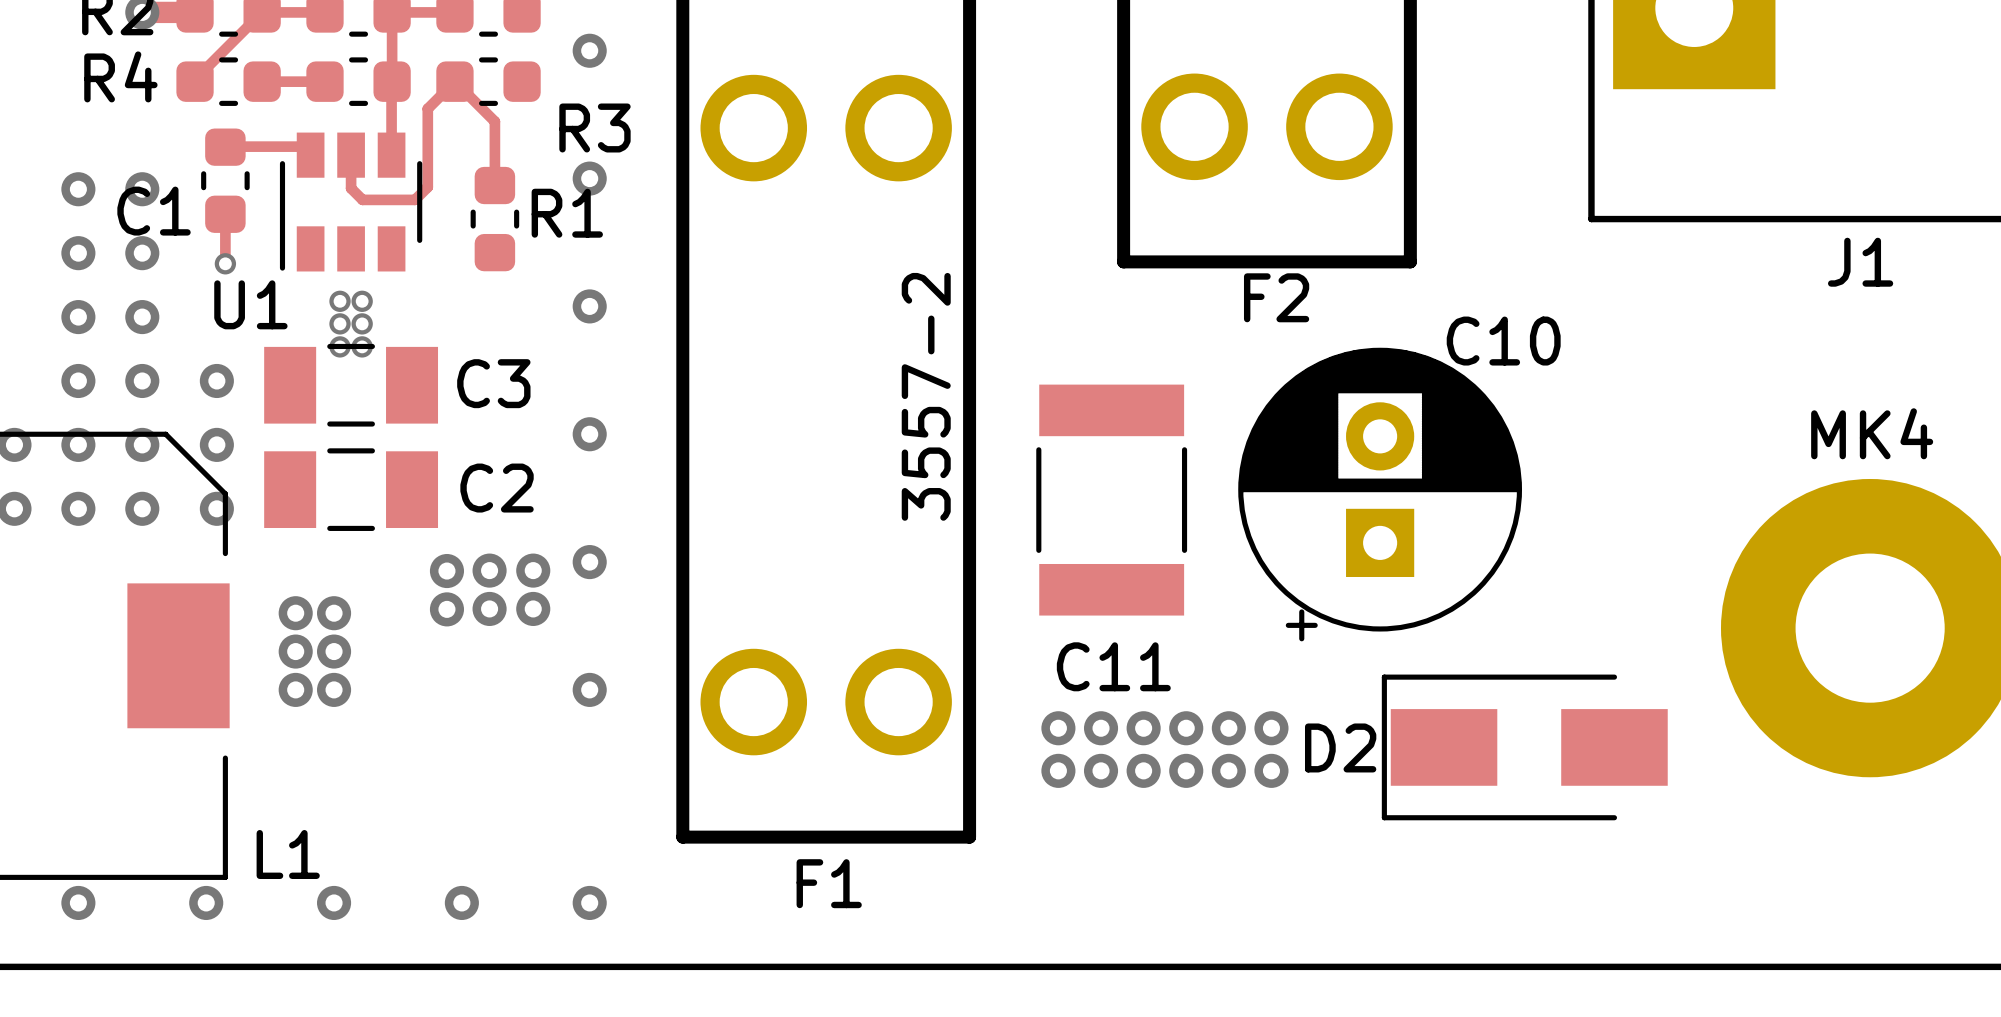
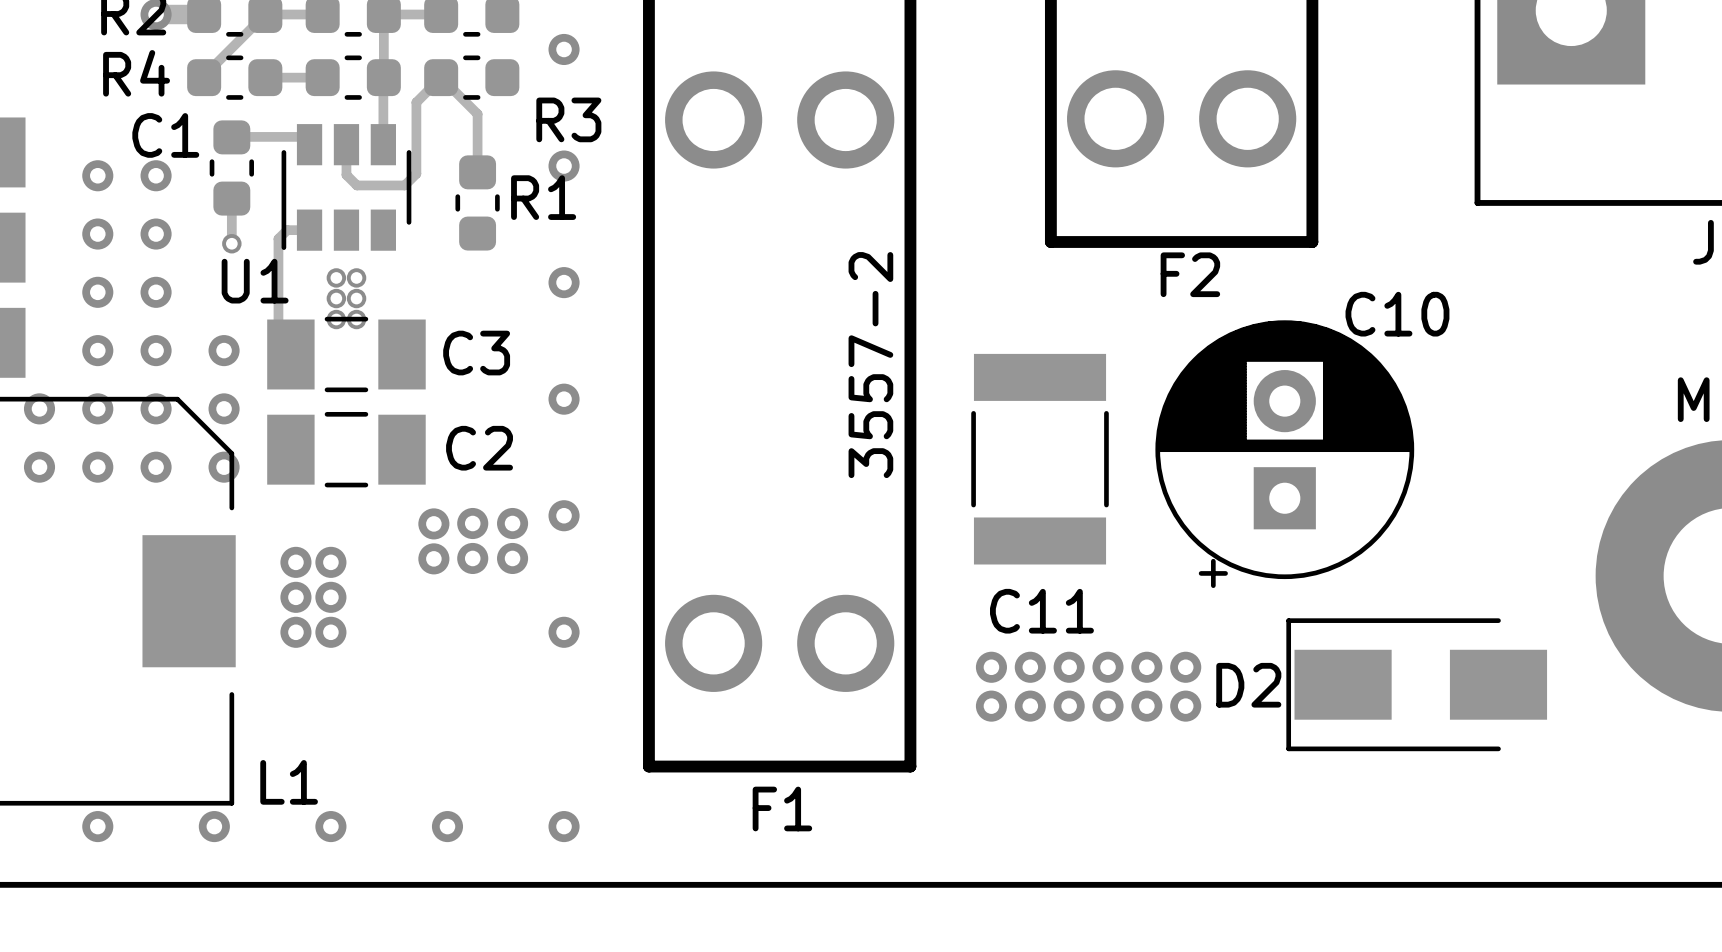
C1 name position: C1 (154, 211) -> C1 (165, 135)
track: none -> (309, 230) (287, 230) (278, 238) (278, 330) (290, 343) (290, 354)

